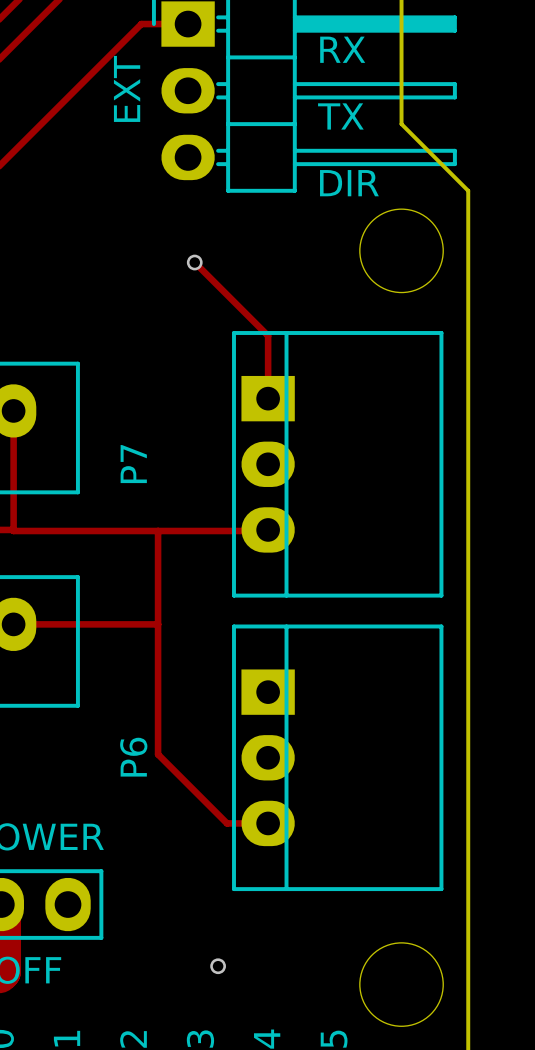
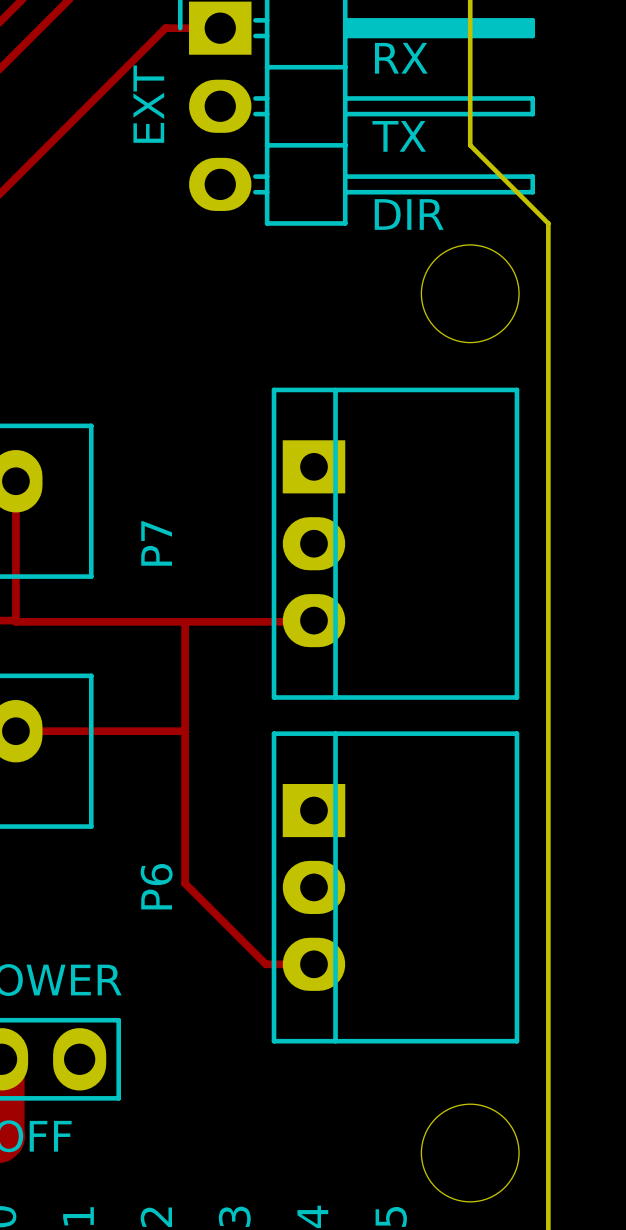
track: (194, 262) (268, 335) (268, 398) -> none
via: (194, 262) -> none
via: (218, 966) -> none

